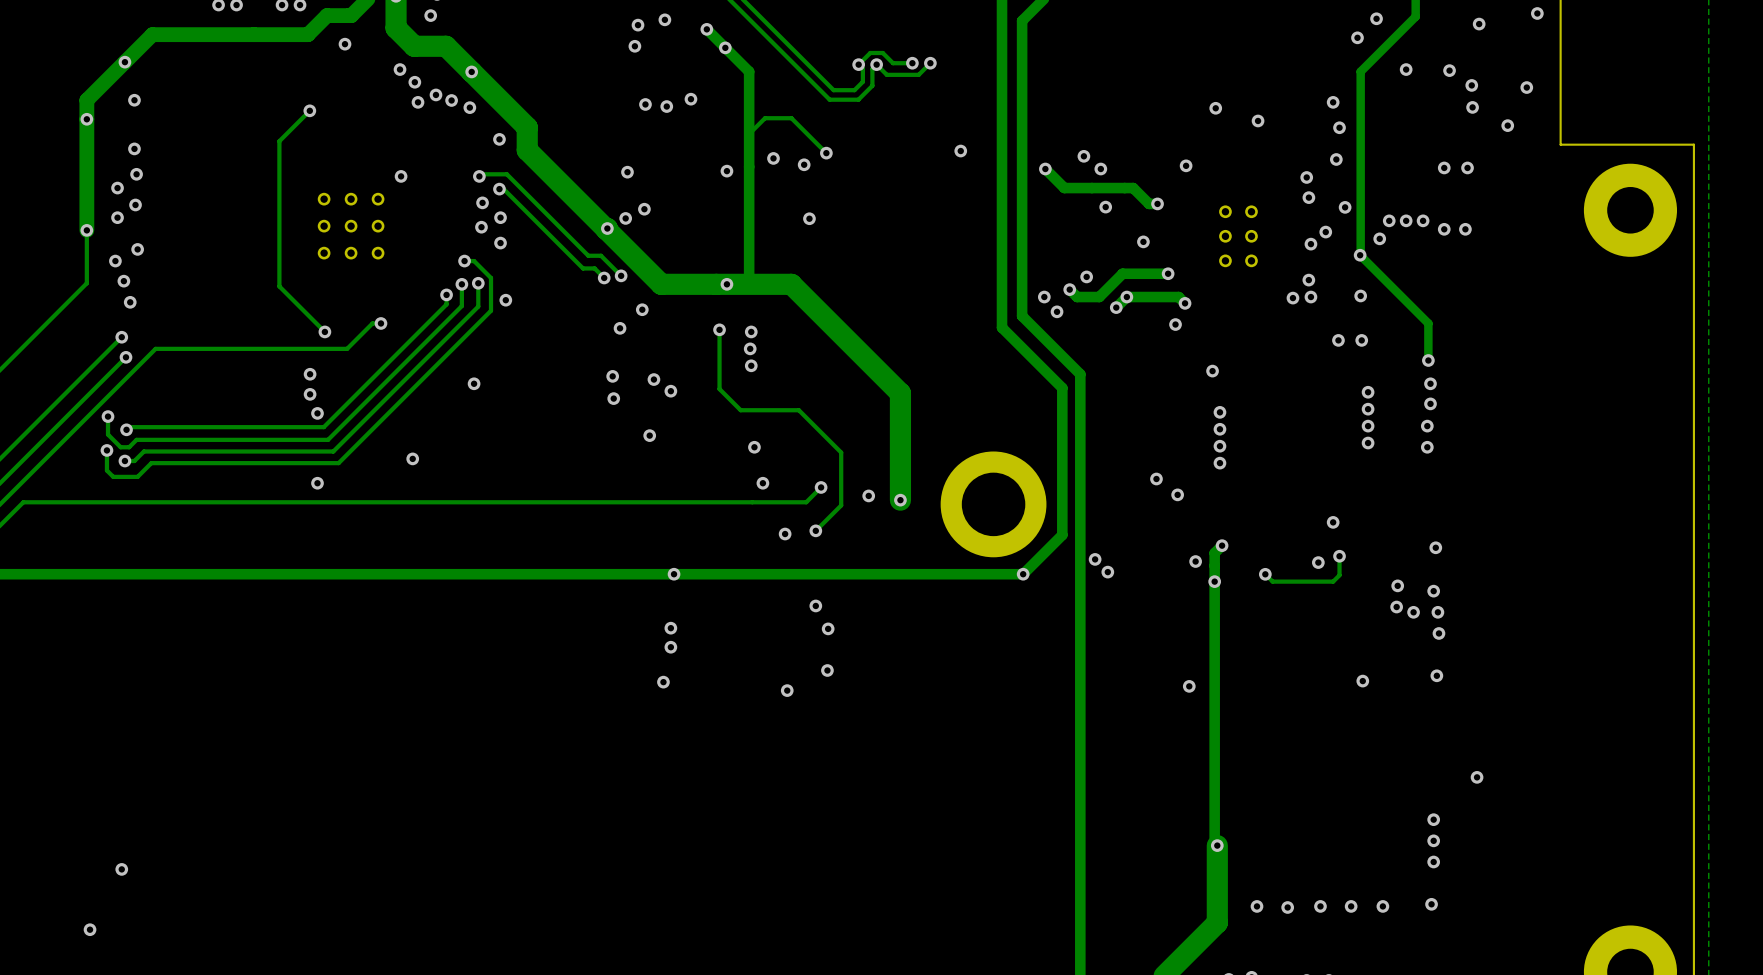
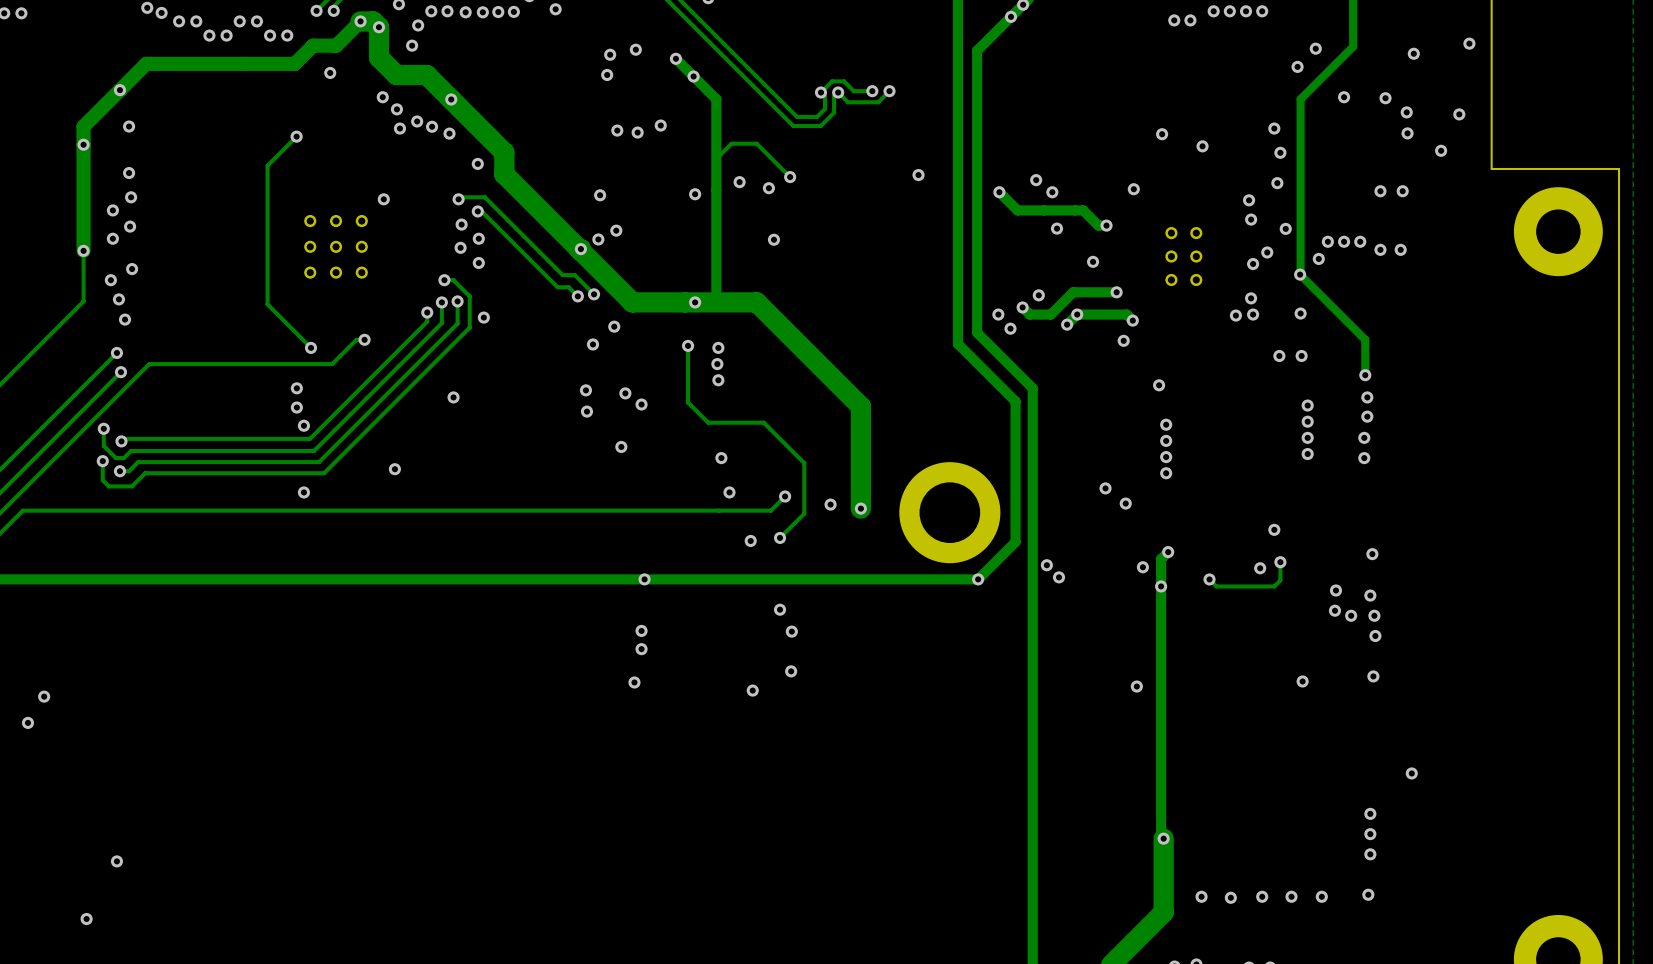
via: none -> (44, 696)
via: none -> (27, 722)

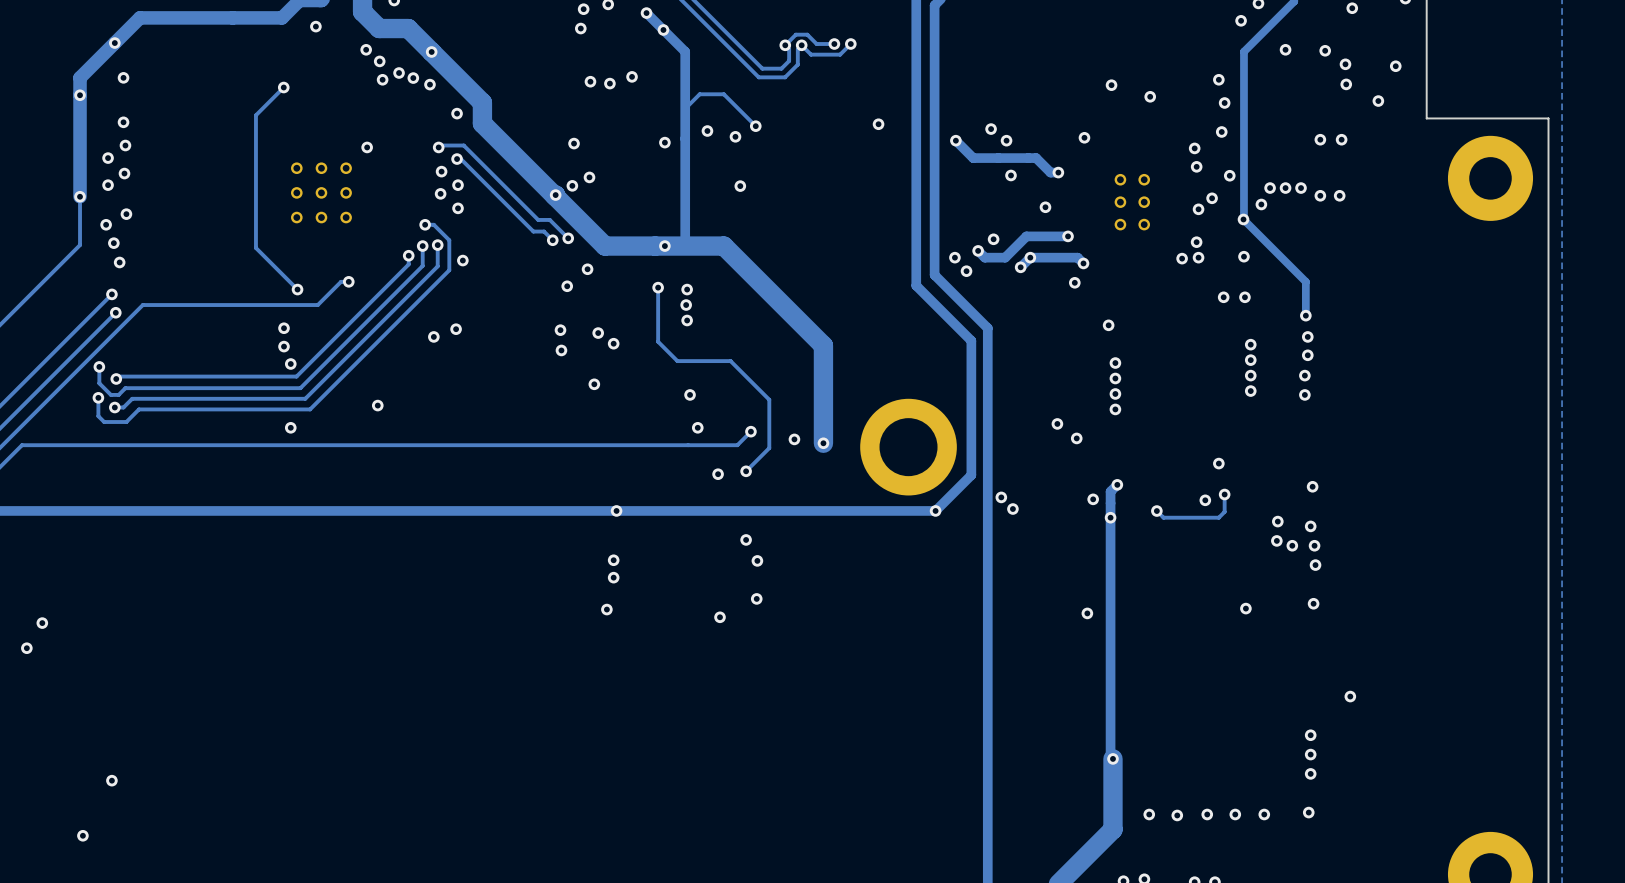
via: none -> (456, 329)

